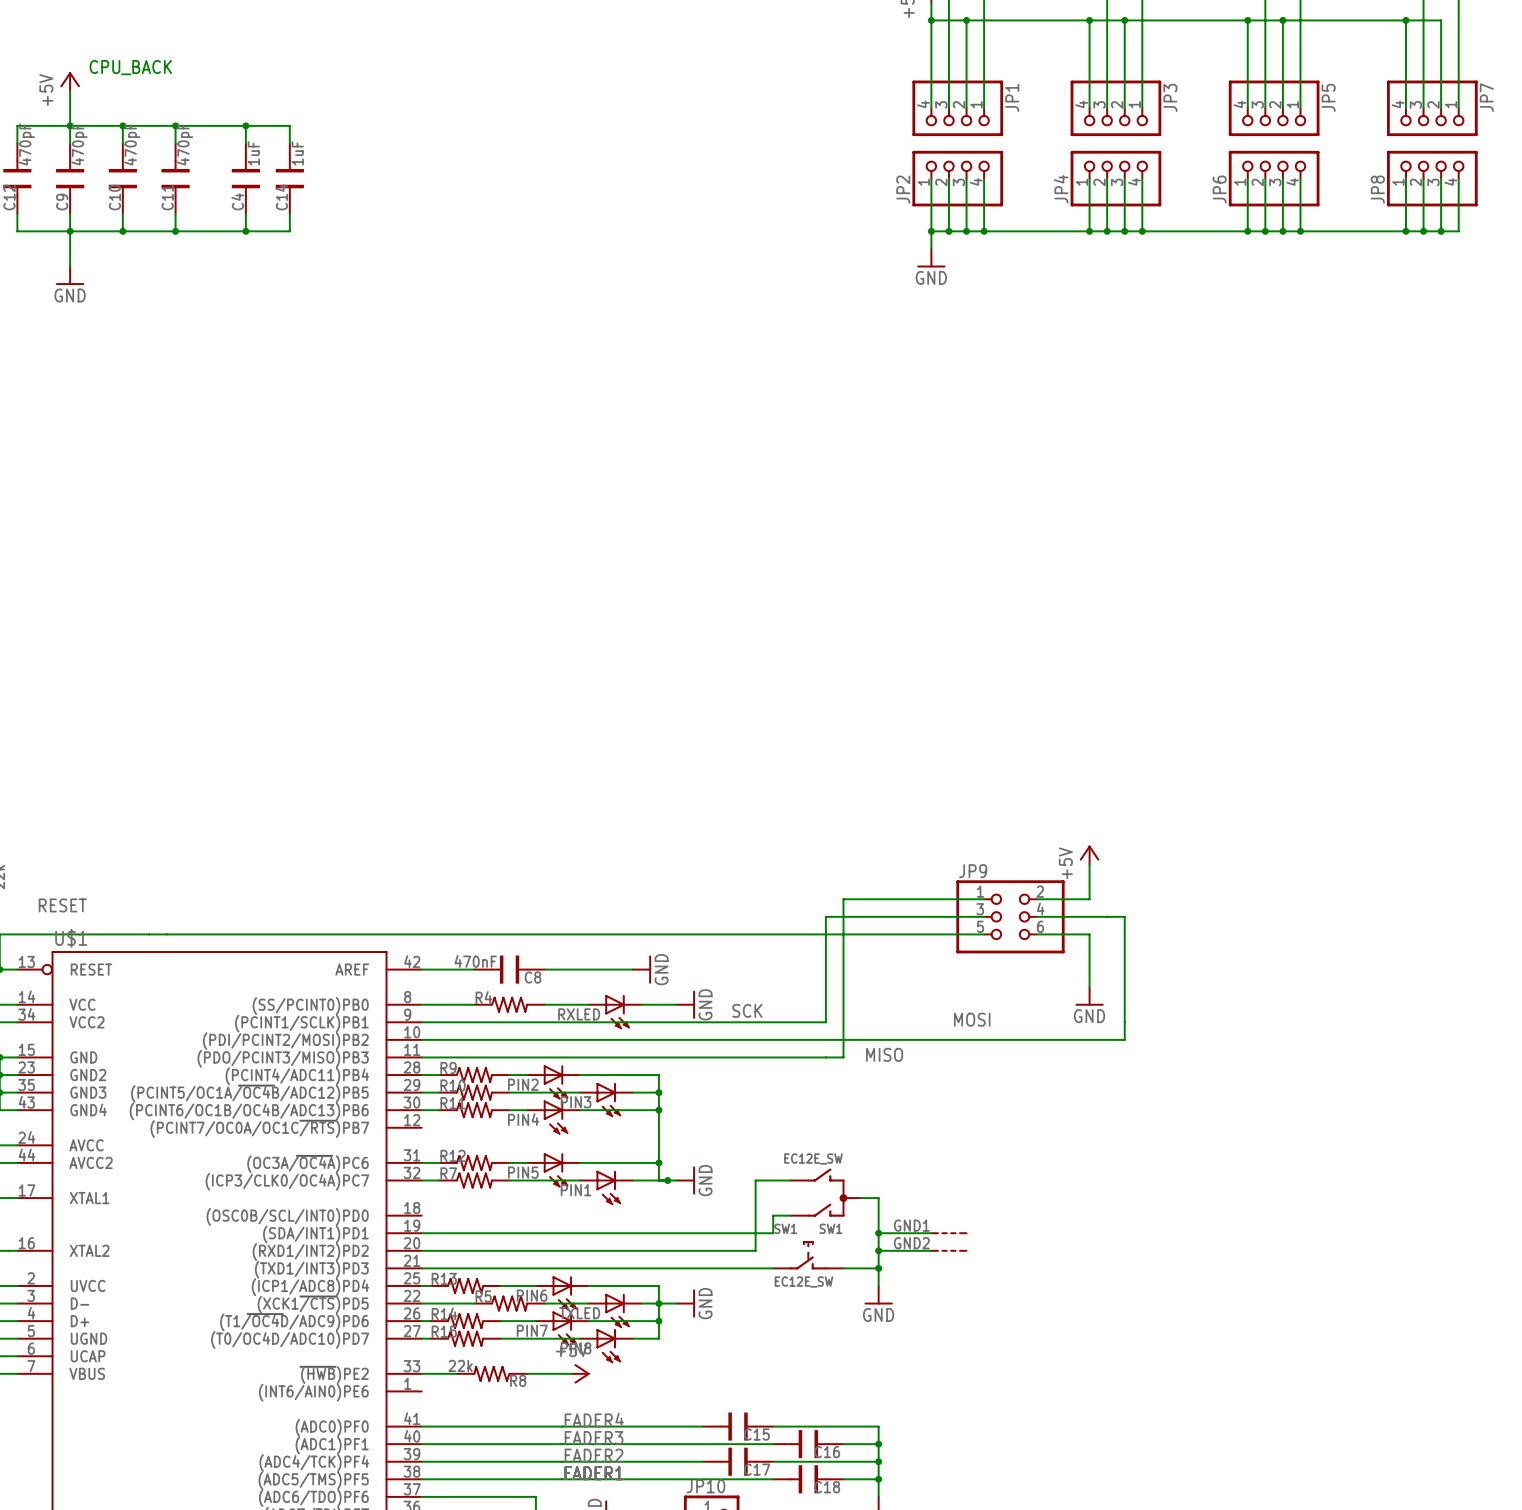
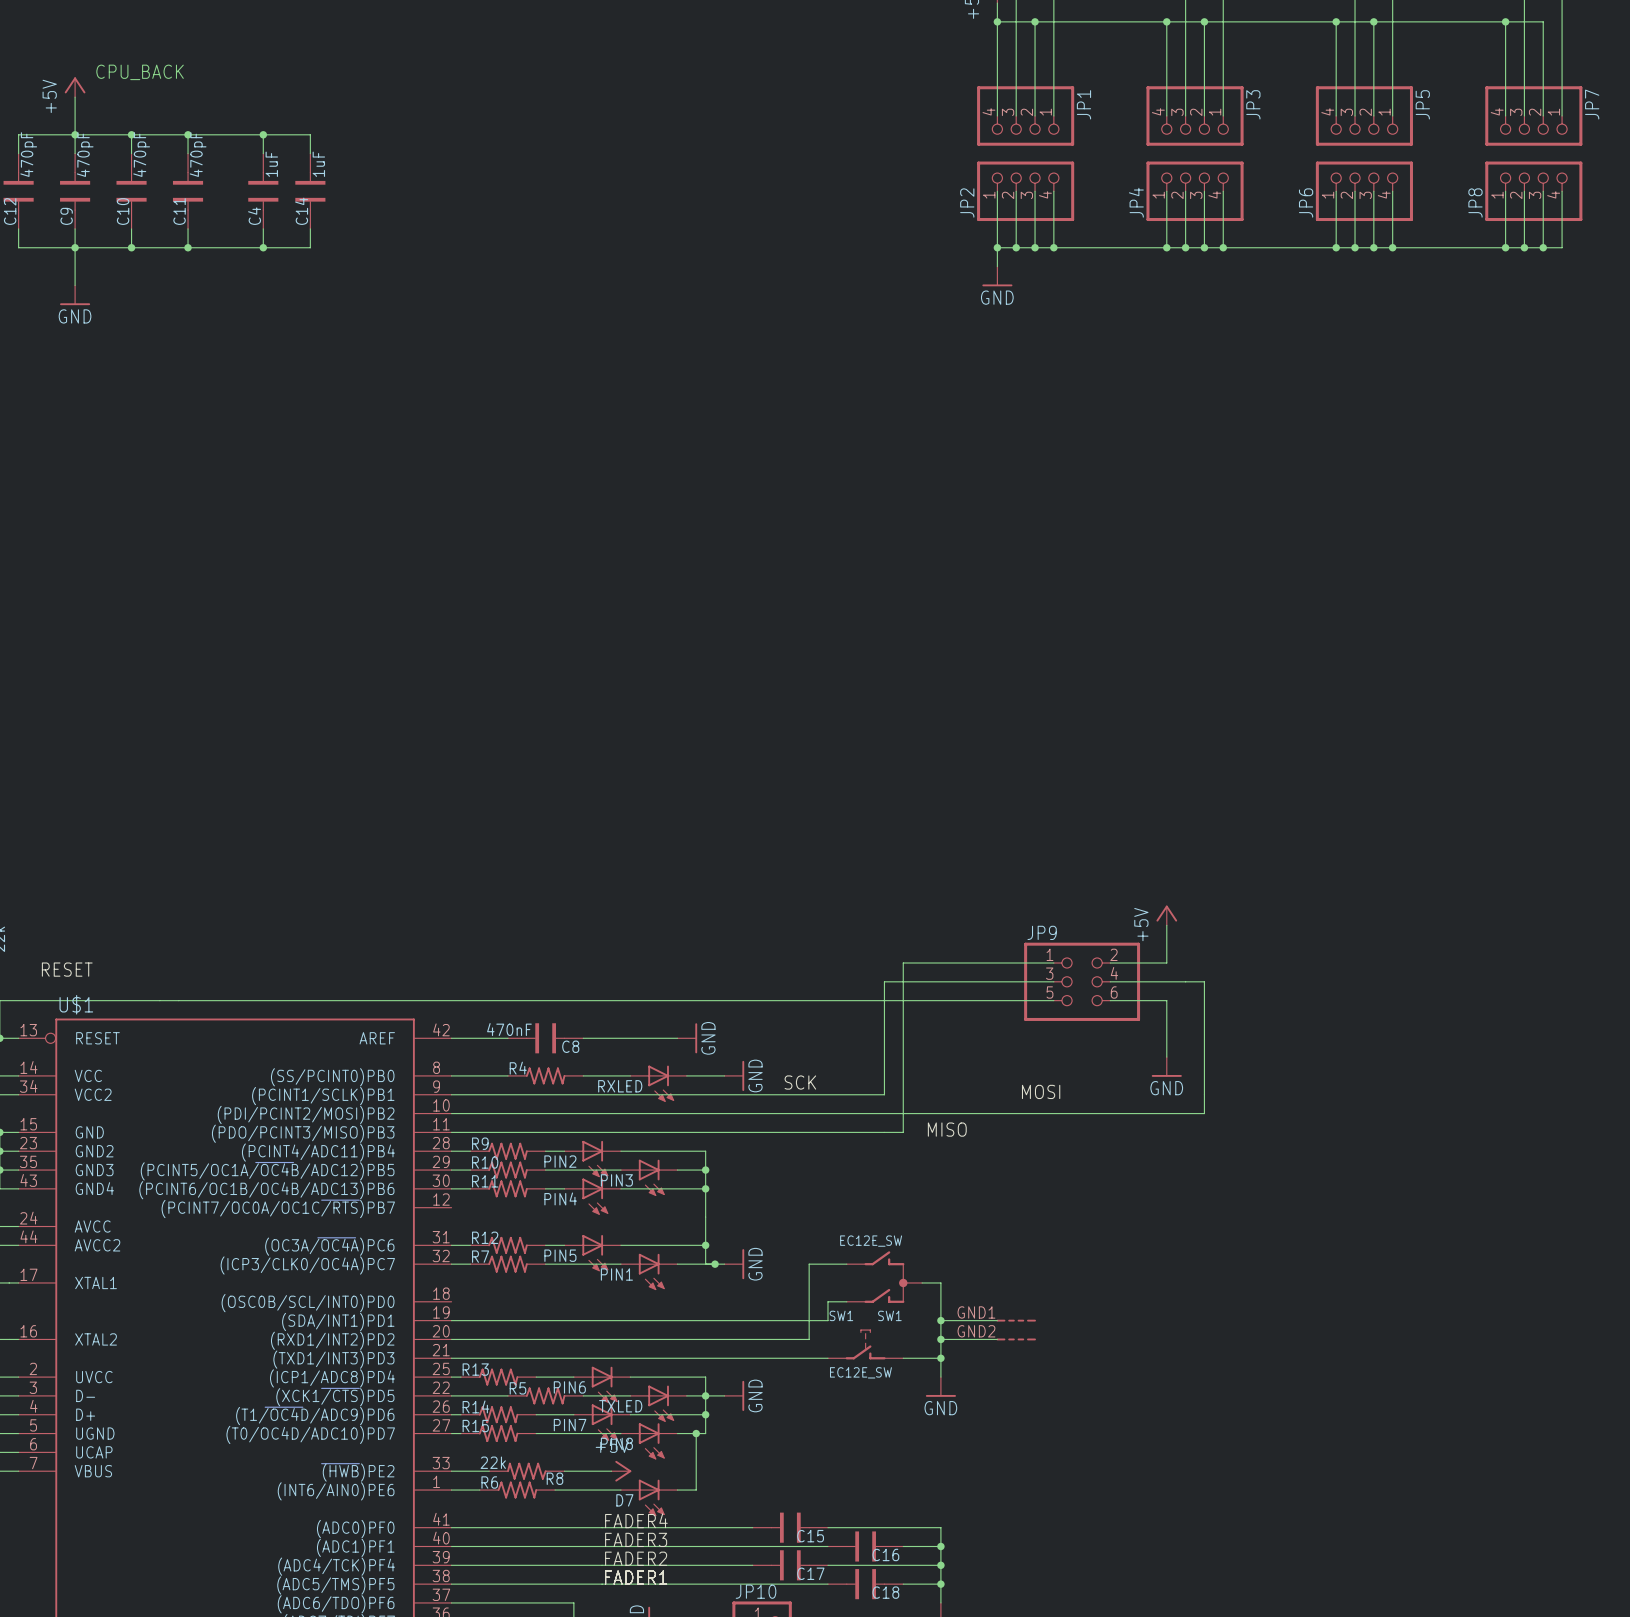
wire: none -> (696, 1433) (696, 1490) (677, 1490)
junction: none -> (696, 1433)
wire: none -> (451, 1490) (479, 1490)
R6: none -> (517, 1490)
wire: none -> (555, 1490) (620, 1490)
D7: none -> (649, 1497)

